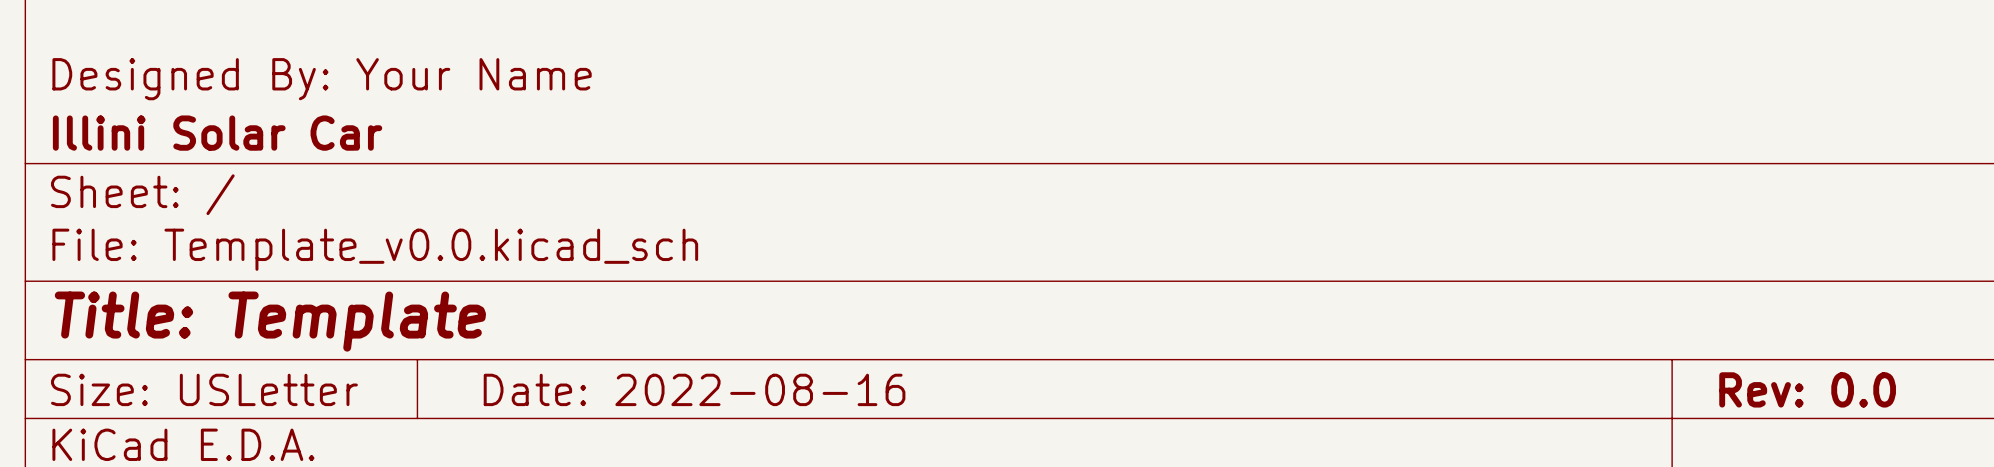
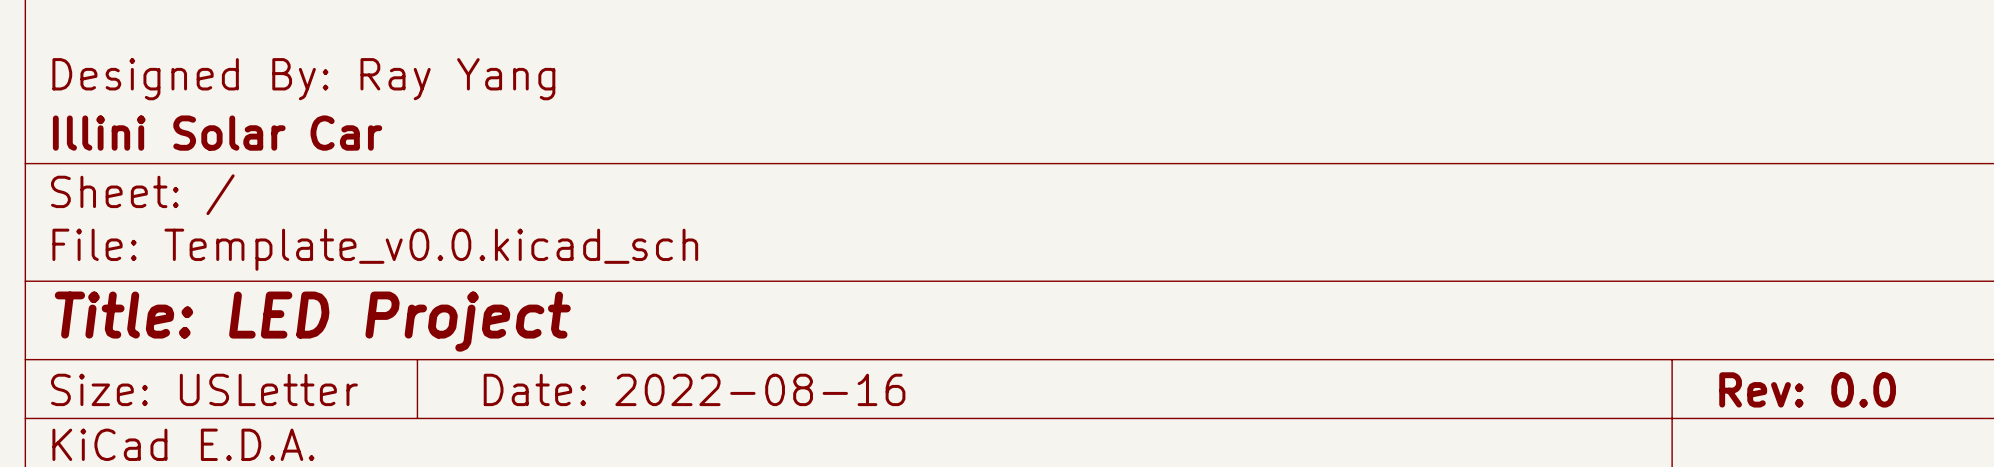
title block: Designed By: Your Name (322, 79) -> Designed By: Ray Yang (303, 79)
title block: Title: Template (270, 321) -> Title: LED Project (312, 321)

